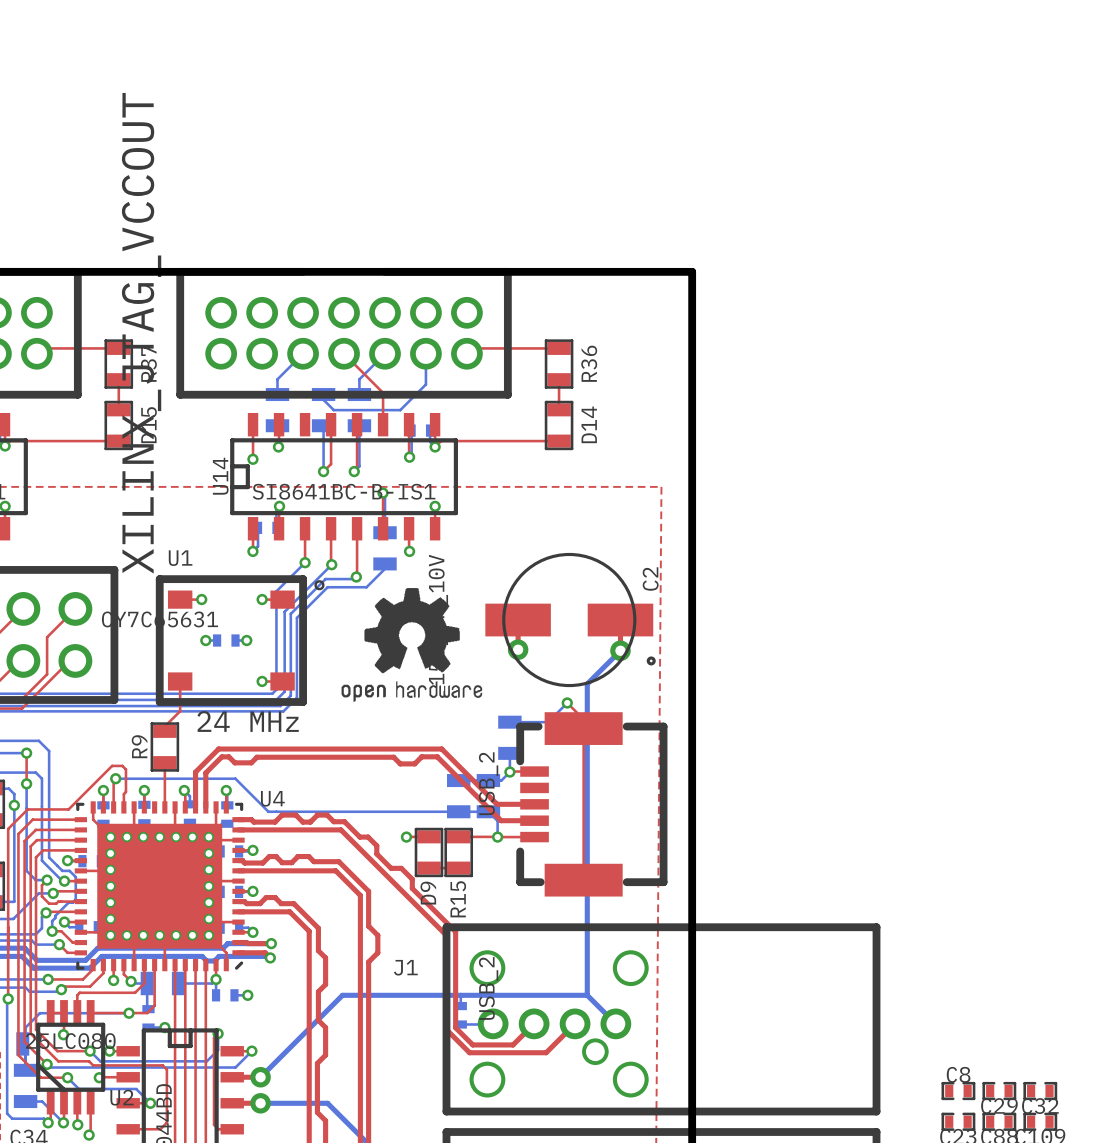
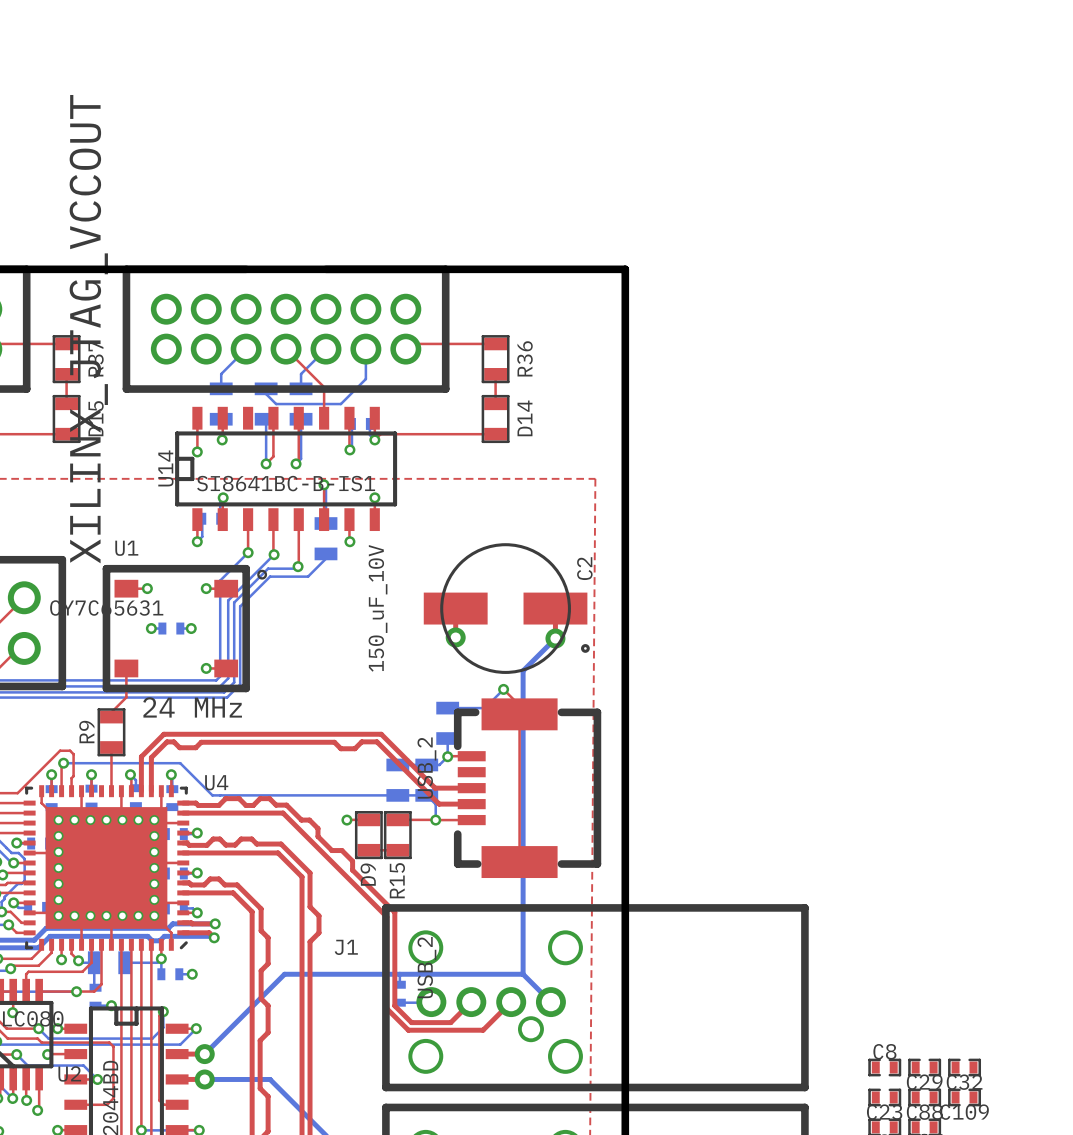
drawing: [341, 588, 483, 703] -> none

